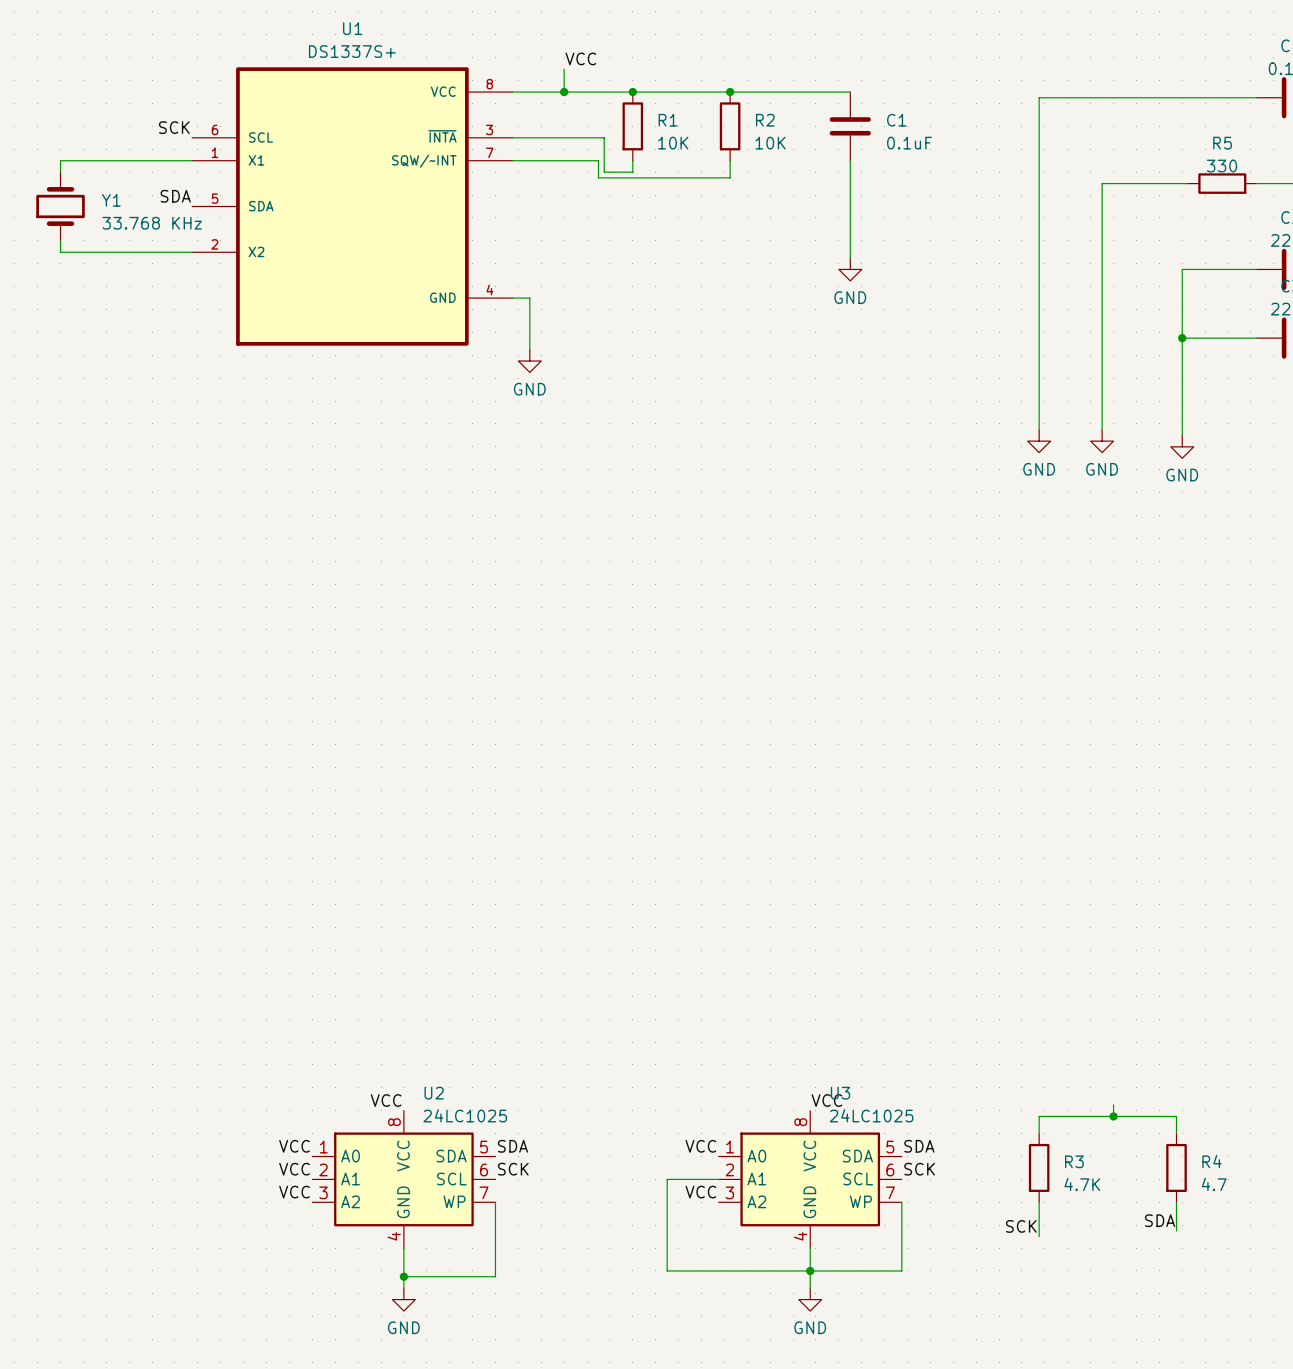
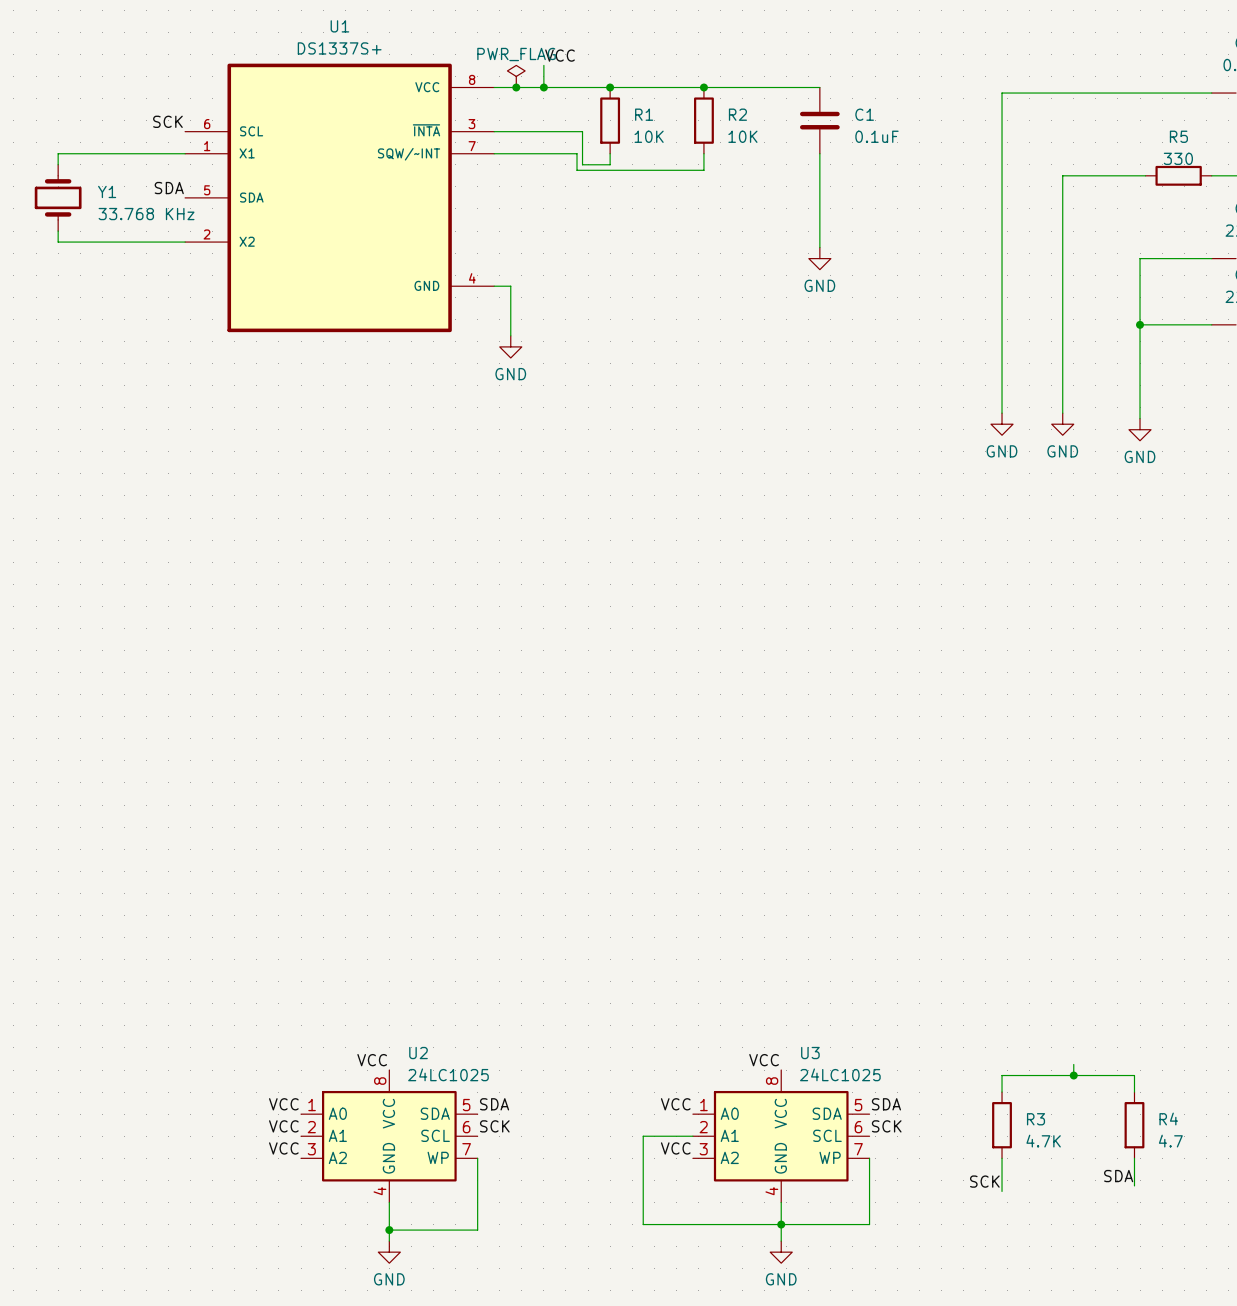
power symbol: none -> PWR_FLAG (516, 76)
junction: none -> (516, 87)
label position: VCC (826, 1100) -> VCC (764, 1060)

